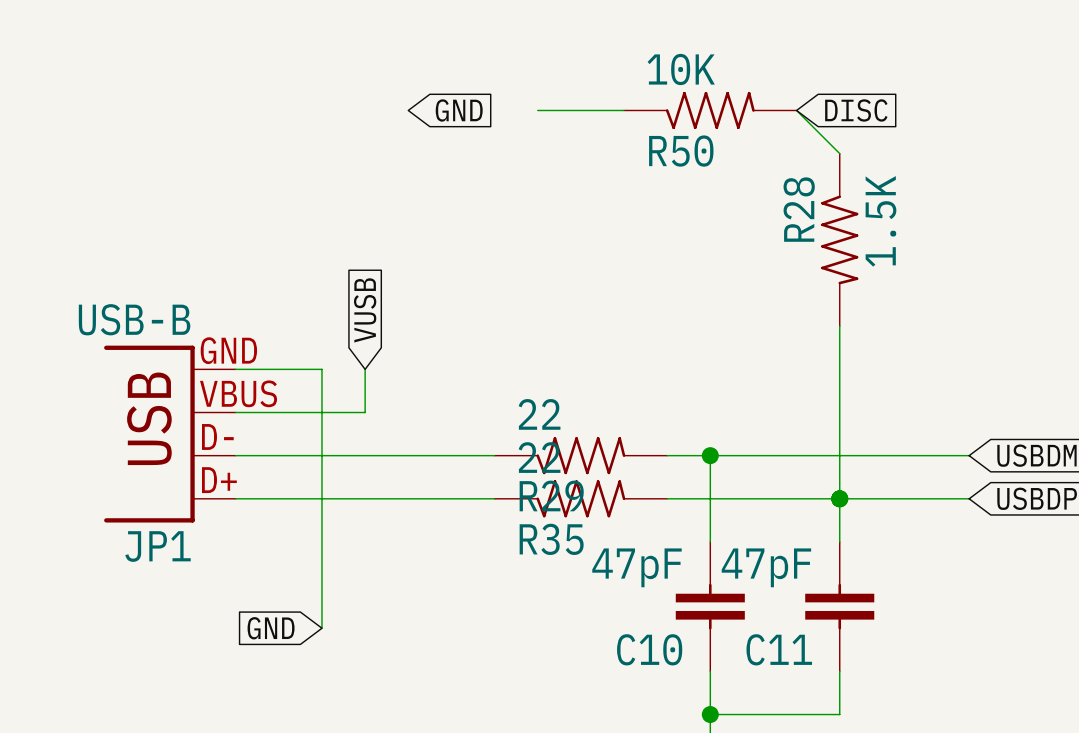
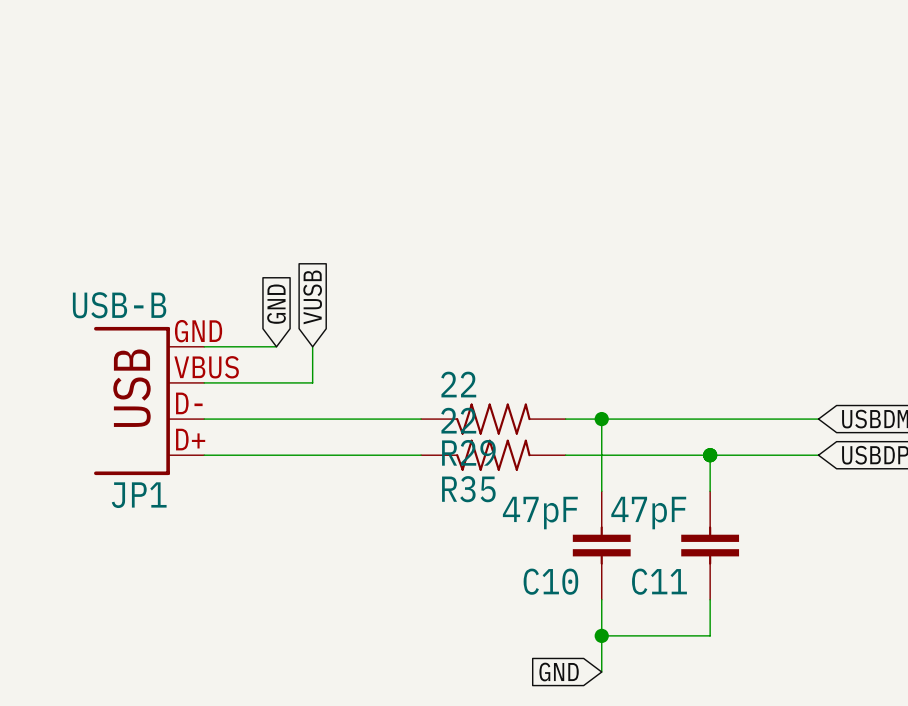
global label: GND (459, 110) -> none
wire: (537, 110) (624, 110) -> none
R50: 10K (710, 110) -> none
wire: (796, 110) (839, 153) -> none
global label: DISC (856, 110) -> none
R28: 1.5K (839, 239) -> none
global label: none -> GND (276, 304)
wire: (839, 326) (839, 498) -> none
wire: (321, 369) (321, 628) -> none
global label: GND (271, 628) -> none

